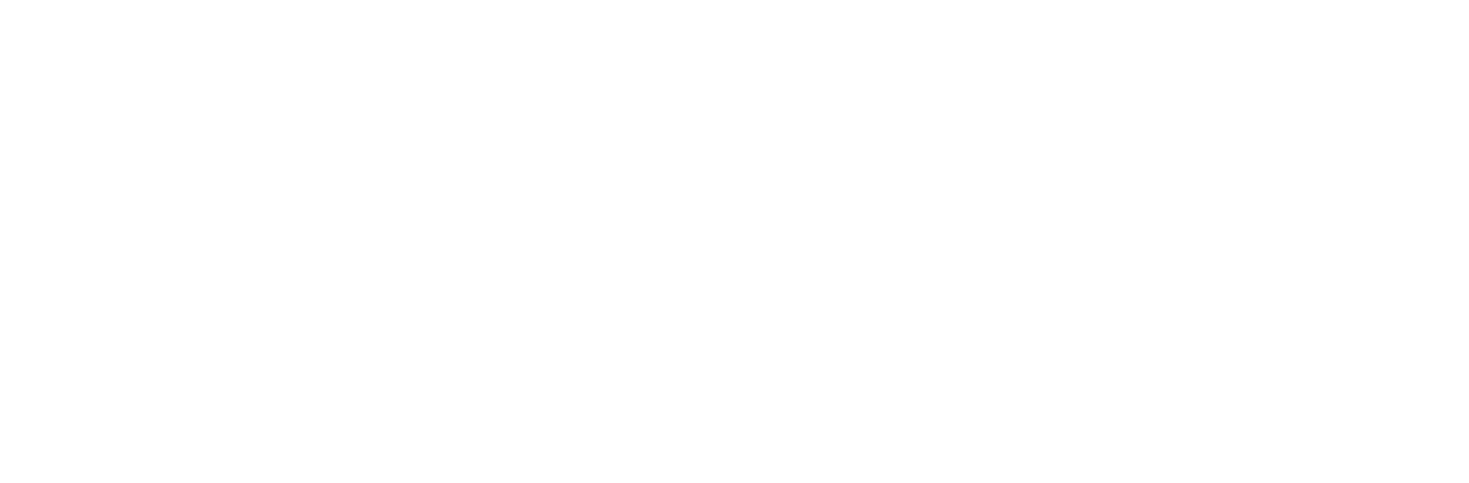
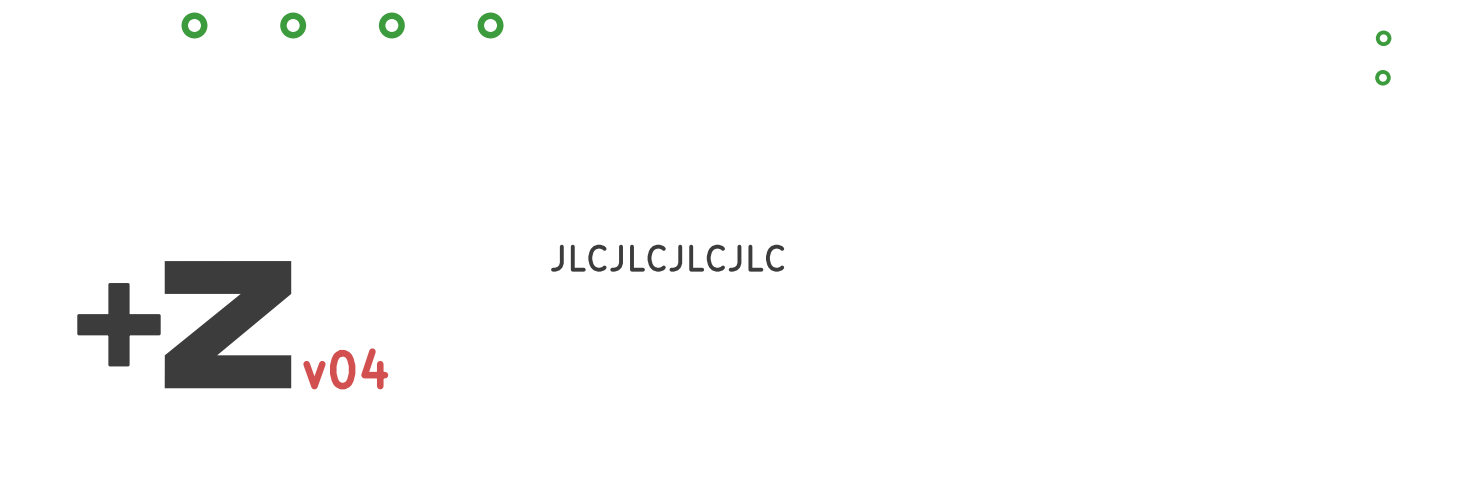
part: none -> (194, 25)
part: none -> (293, 25)
part: none -> (391, 25)
part: none -> (490, 25)
via: none -> (1383, 38)
via: none -> (1382, 77)
text: none -> JLCJLCJLCJLC (667, 258)
drawing: none -> [77, 261, 292, 389]
text: none -> v04 (345, 368)

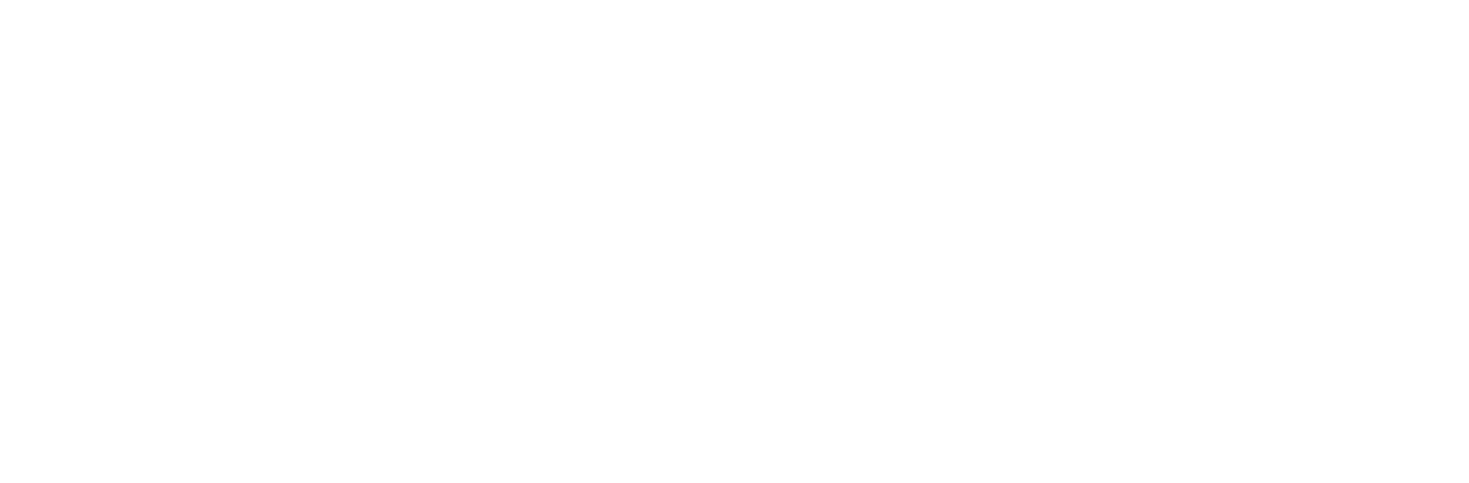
part: (194, 25) -> none
part: (293, 25) -> none
part: (391, 25) -> none
part: (490, 25) -> none
via: (1383, 38) -> none
via: (1382, 77) -> none
text: JLCJLCJLCJLC (667, 258) -> none
drawing: [77, 261, 292, 389] -> none
text: v04 (345, 368) -> none

